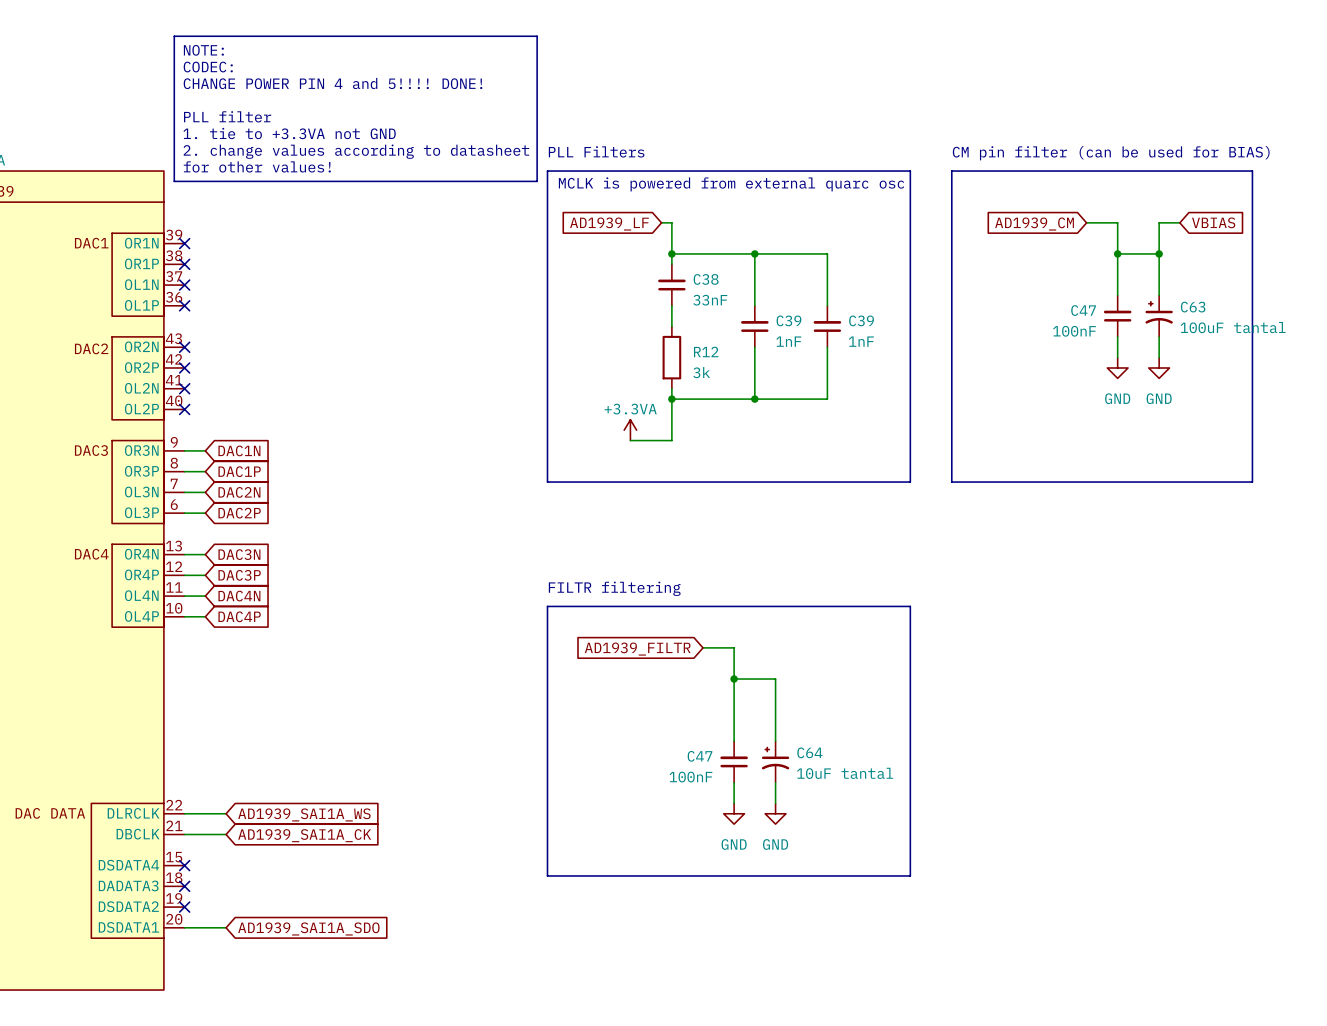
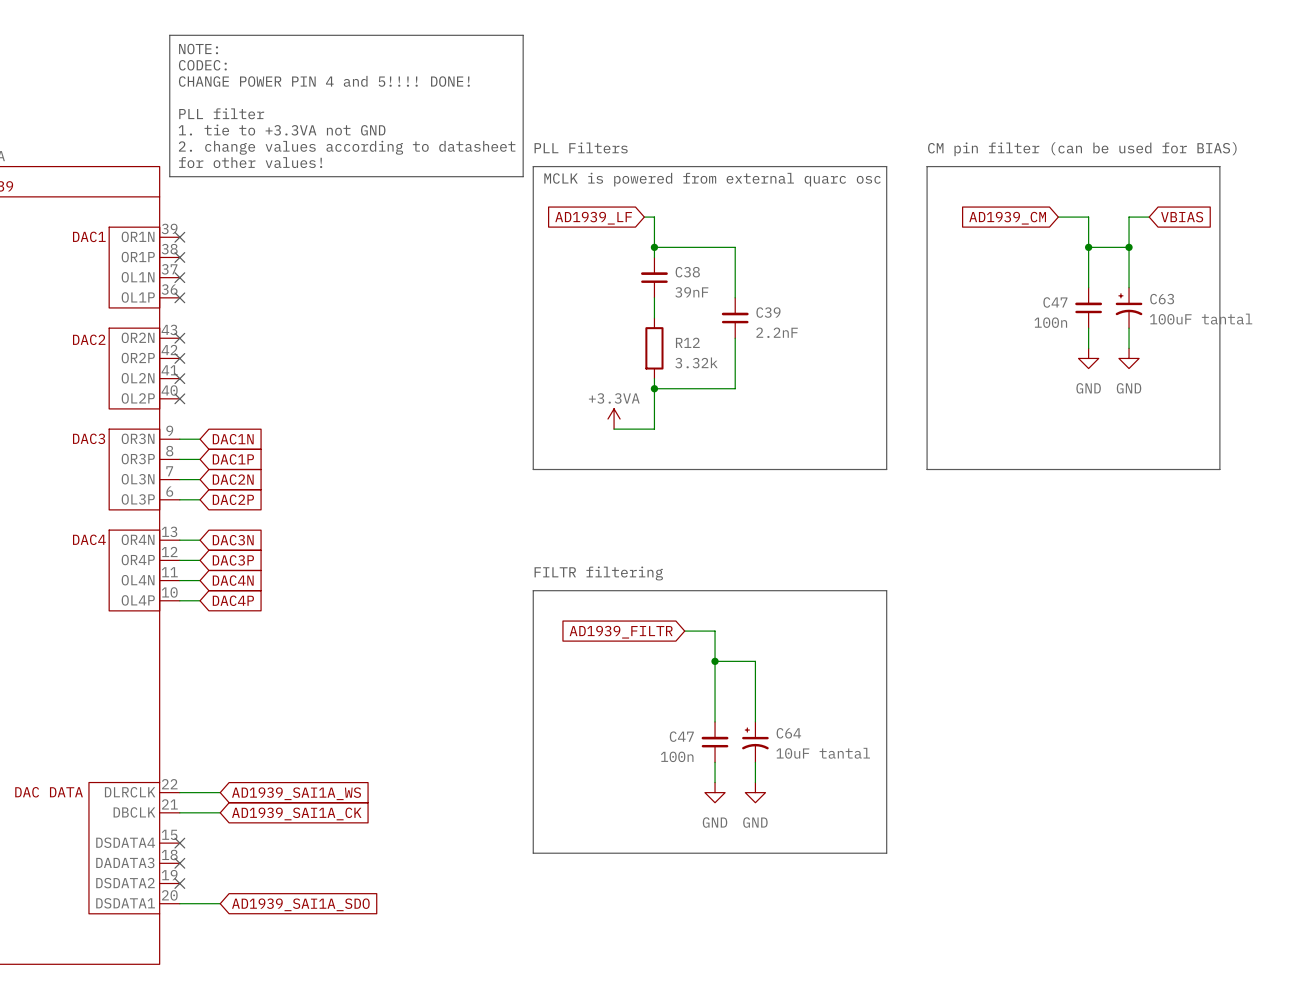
wire: (754, 253) (827, 253) (827, 305) -> none
junction: (754, 253) -> none
C38 value: 33nF (710, 300) -> 39nF (691, 292)
C39: 1nF (827, 326) -> none
C47 value: 100nF (1074, 331) -> 100n (1050, 322)
C39 value: 1nF (788, 341) -> 2.2nF (777, 332)
wire: (827, 347) (827, 399) (754, 399) -> none
R12 value: 3k (701, 372) -> 3.32k (696, 362)
junction: (754, 399) -> none
C47 value: 100nF (690, 777) -> 100n (677, 756)

